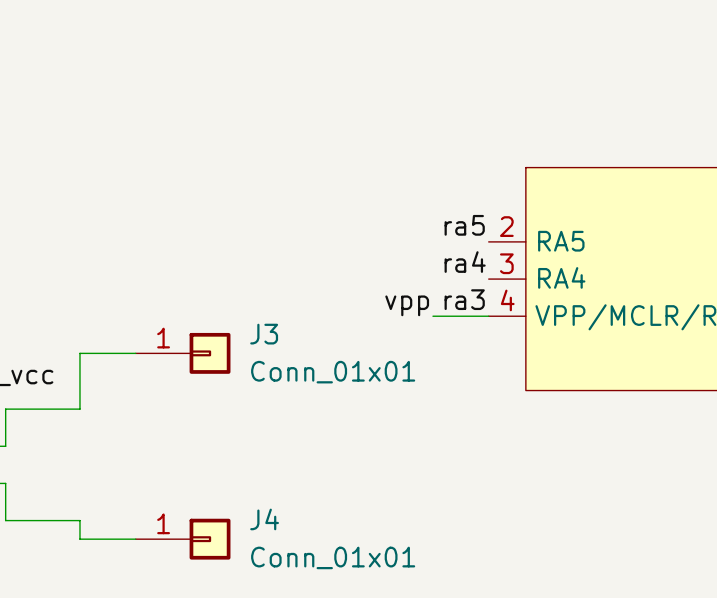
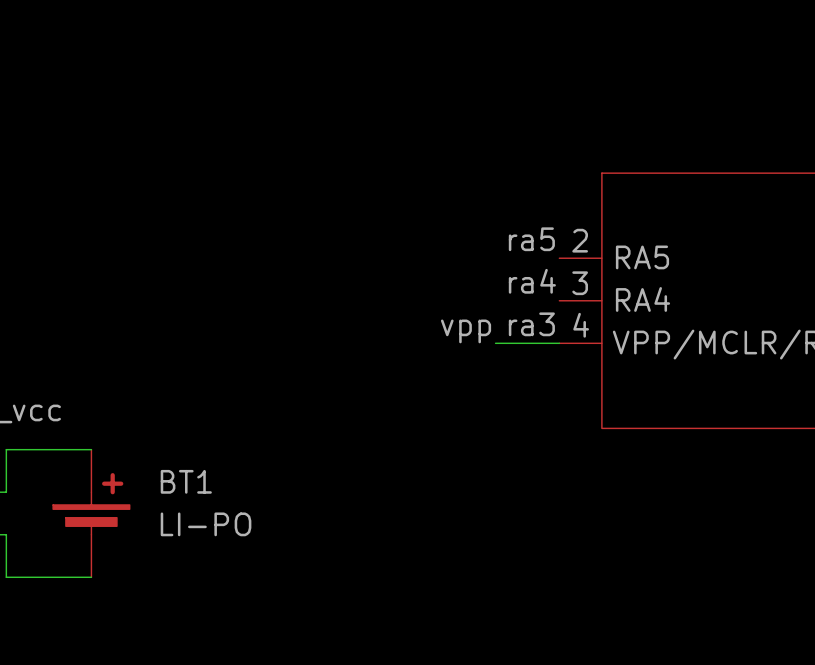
wire: (135, 353) (79, 353) (79, 409) -> none
J3: Conn_01x01 (183, 353) -> none
BT1: none -> LI-PO (91, 513)
wire: (79, 520) (79, 539) (135, 539) -> none
J4: Conn_01x01 (183, 539) -> none

